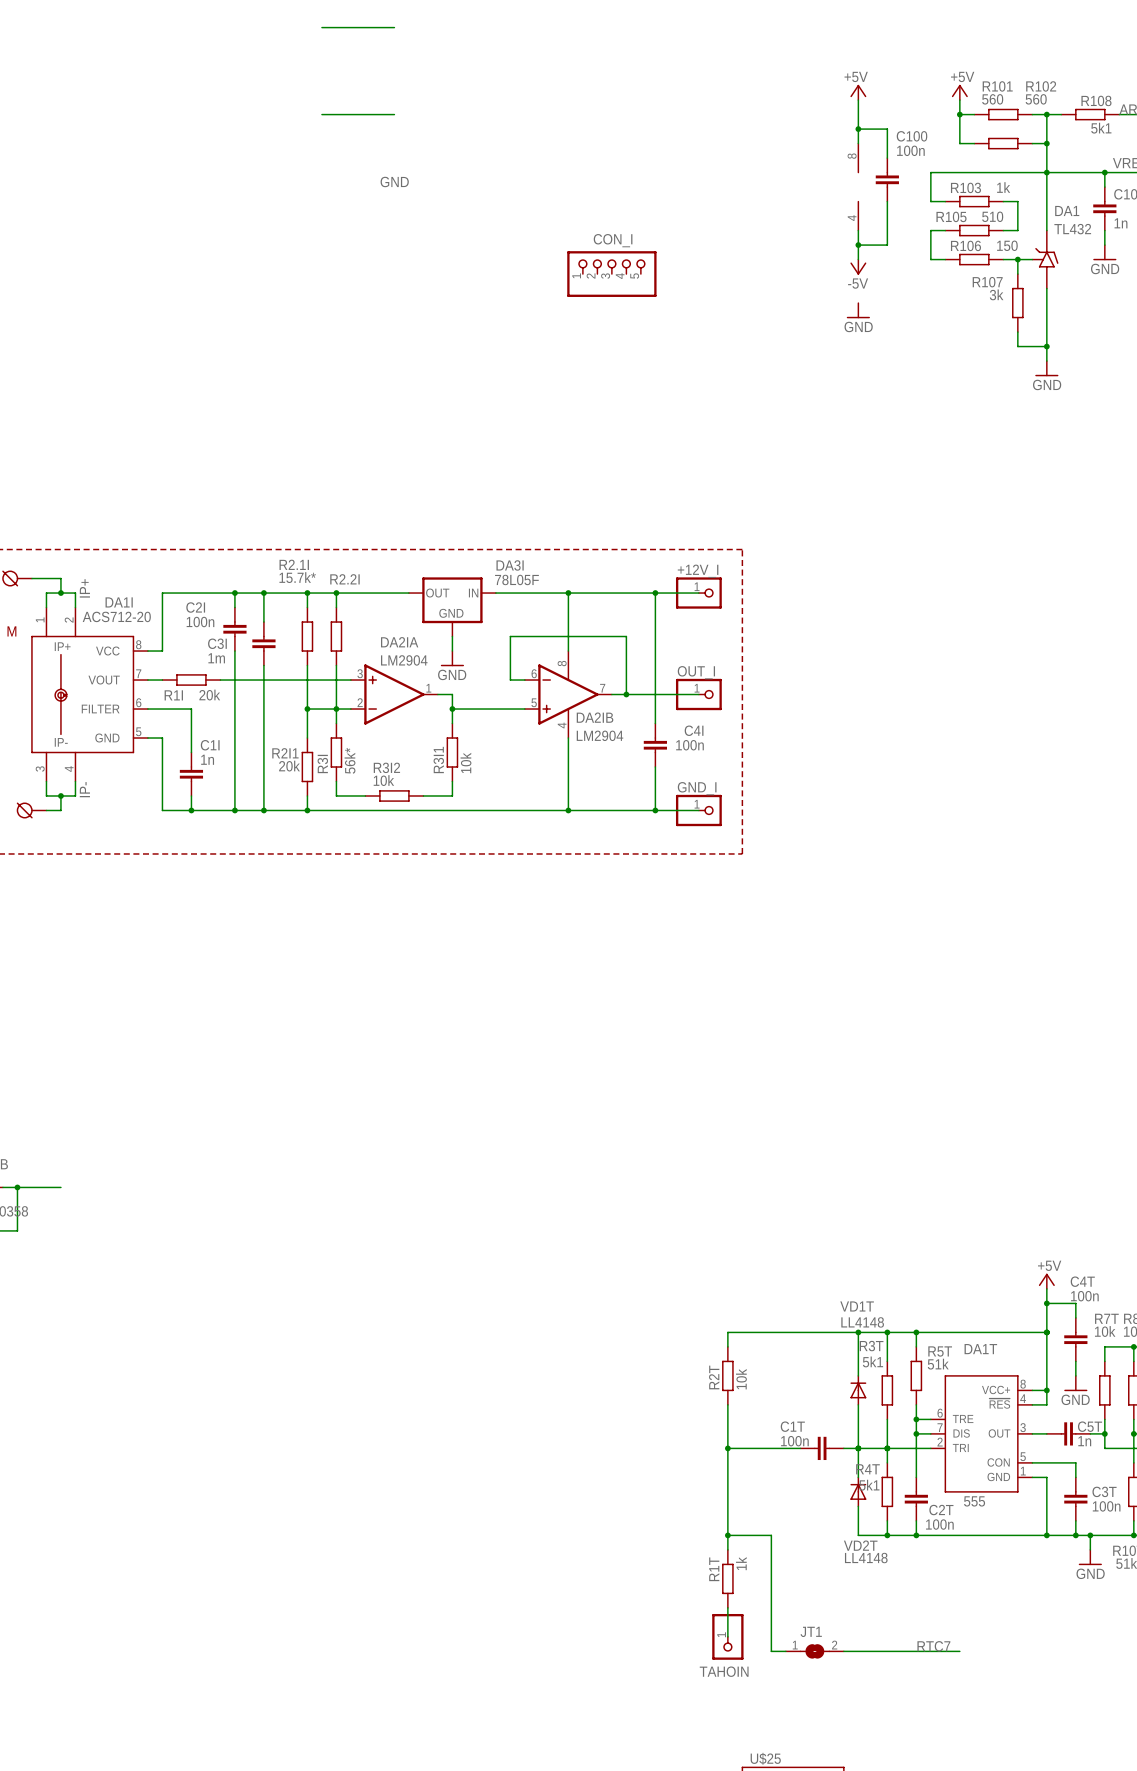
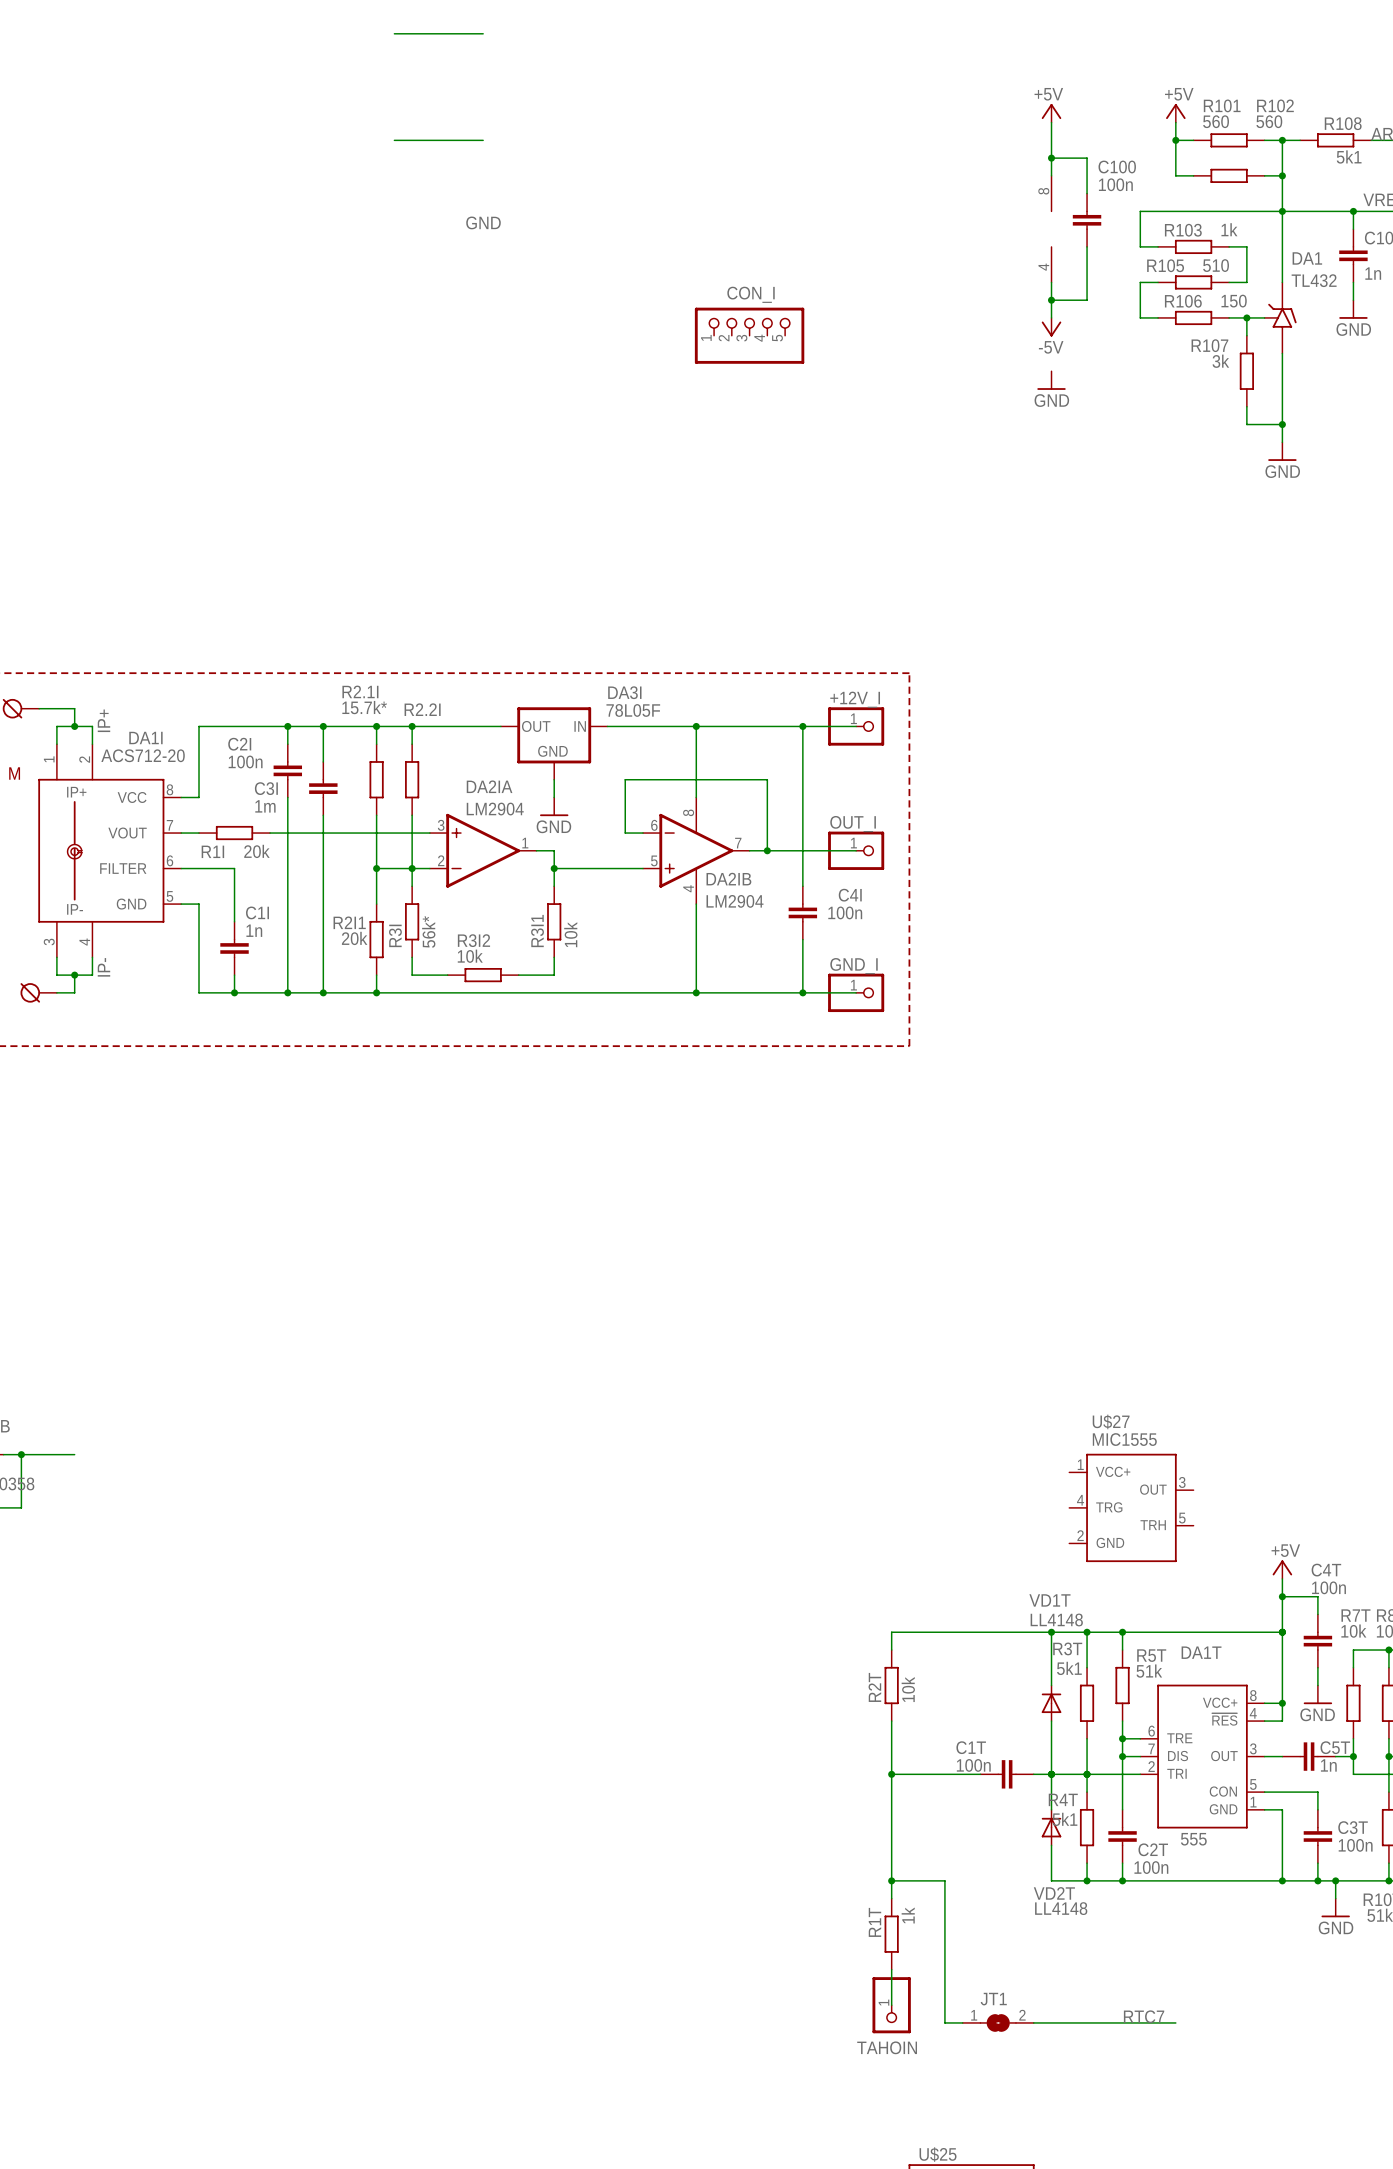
U$27: none -> MIC1555 (1131, 1507)

